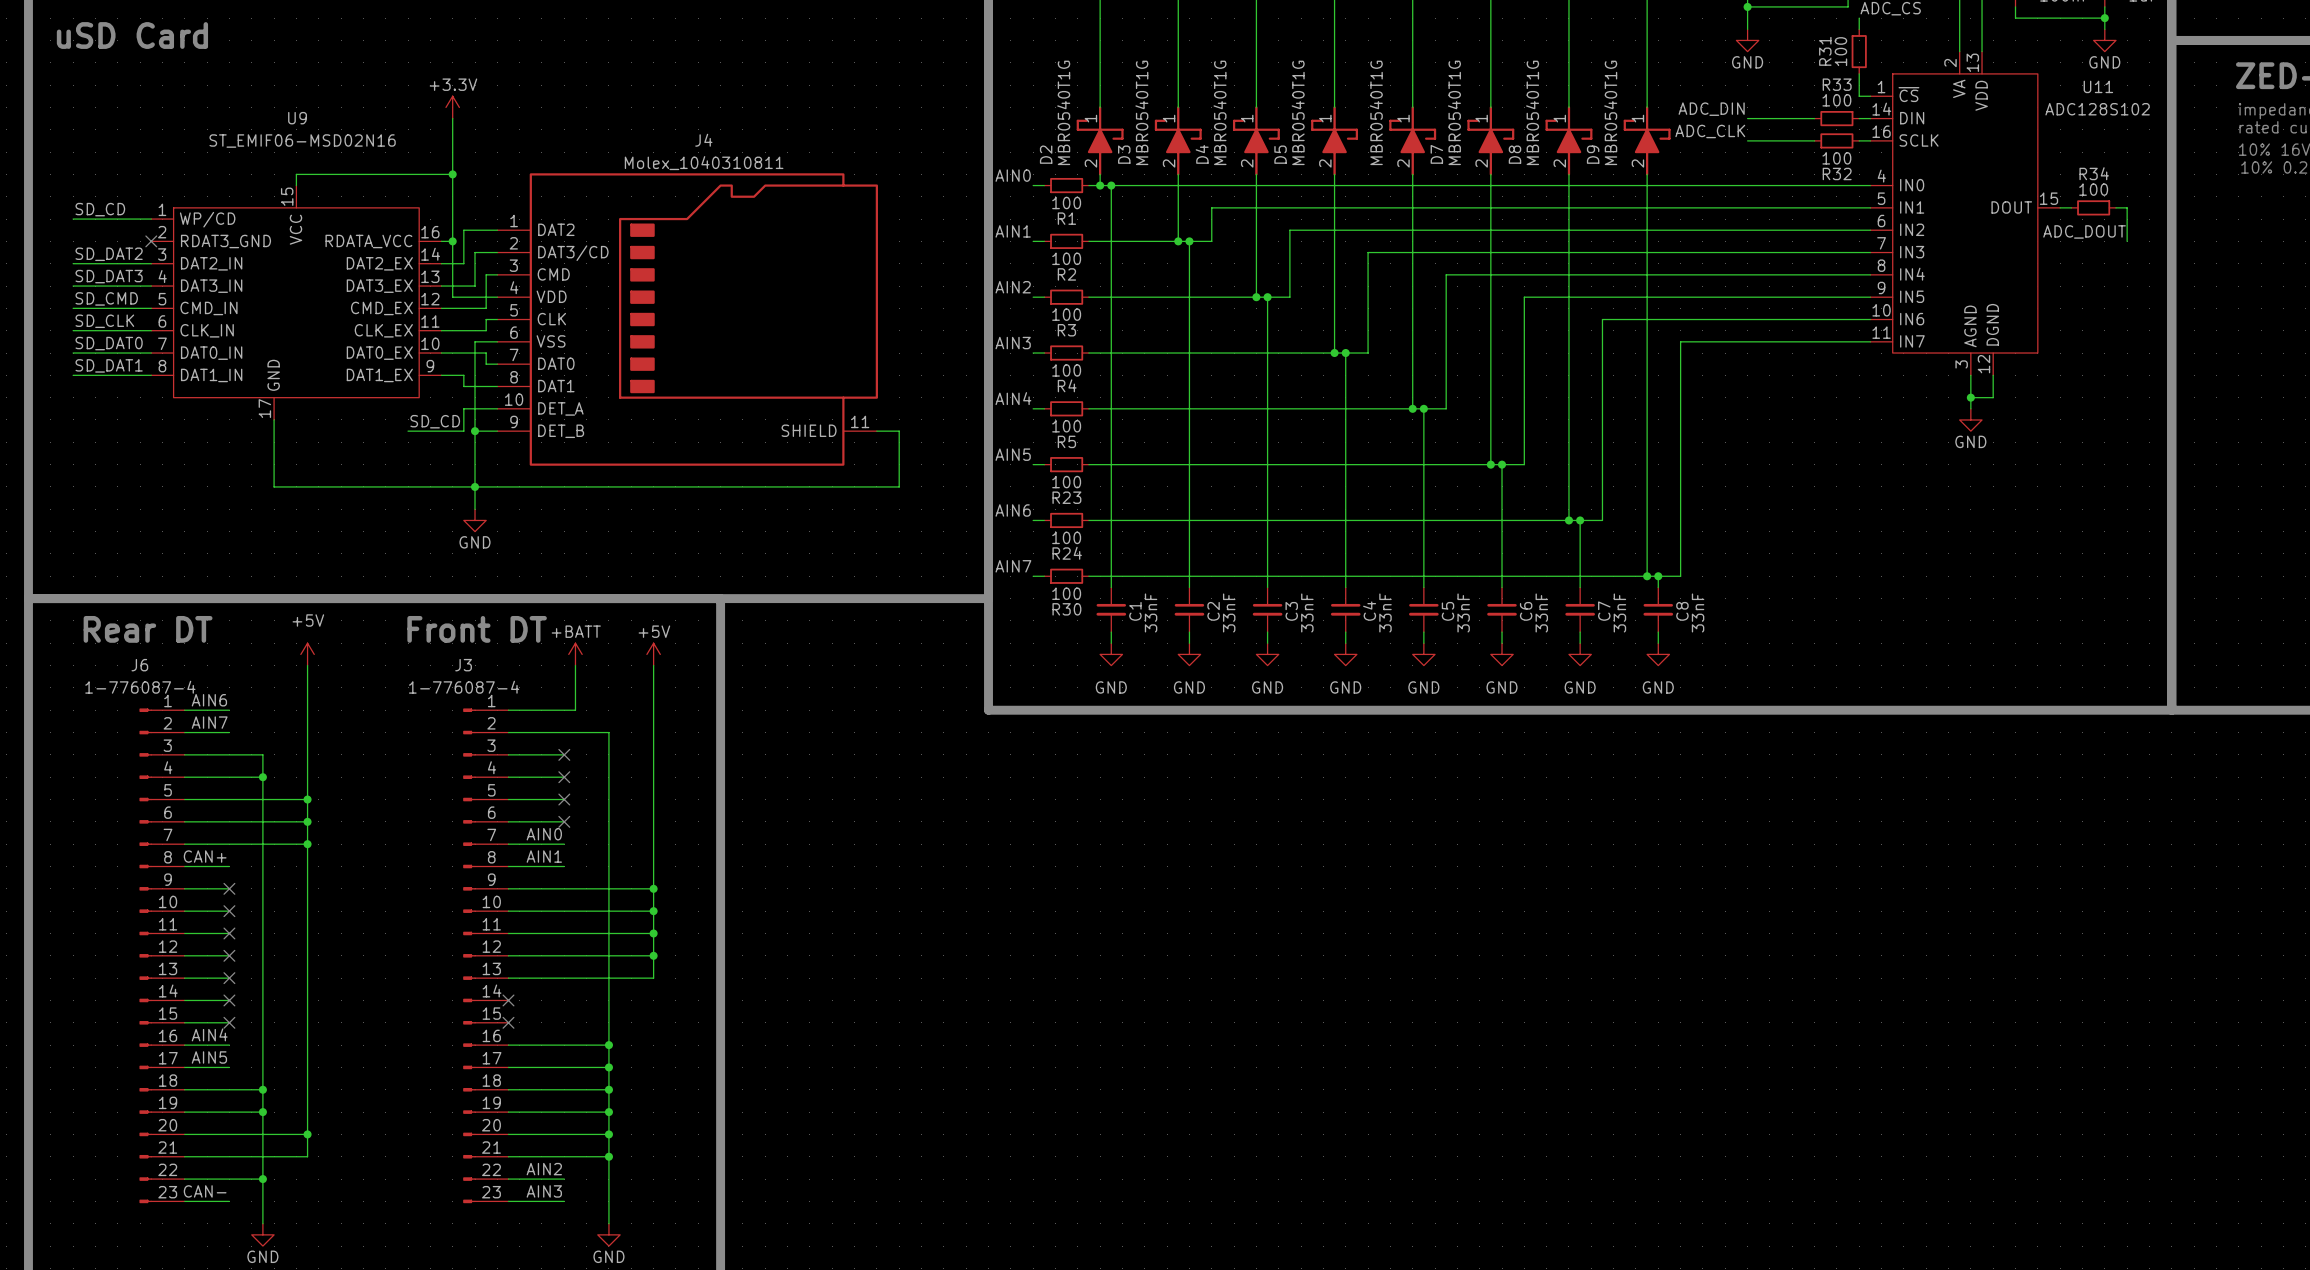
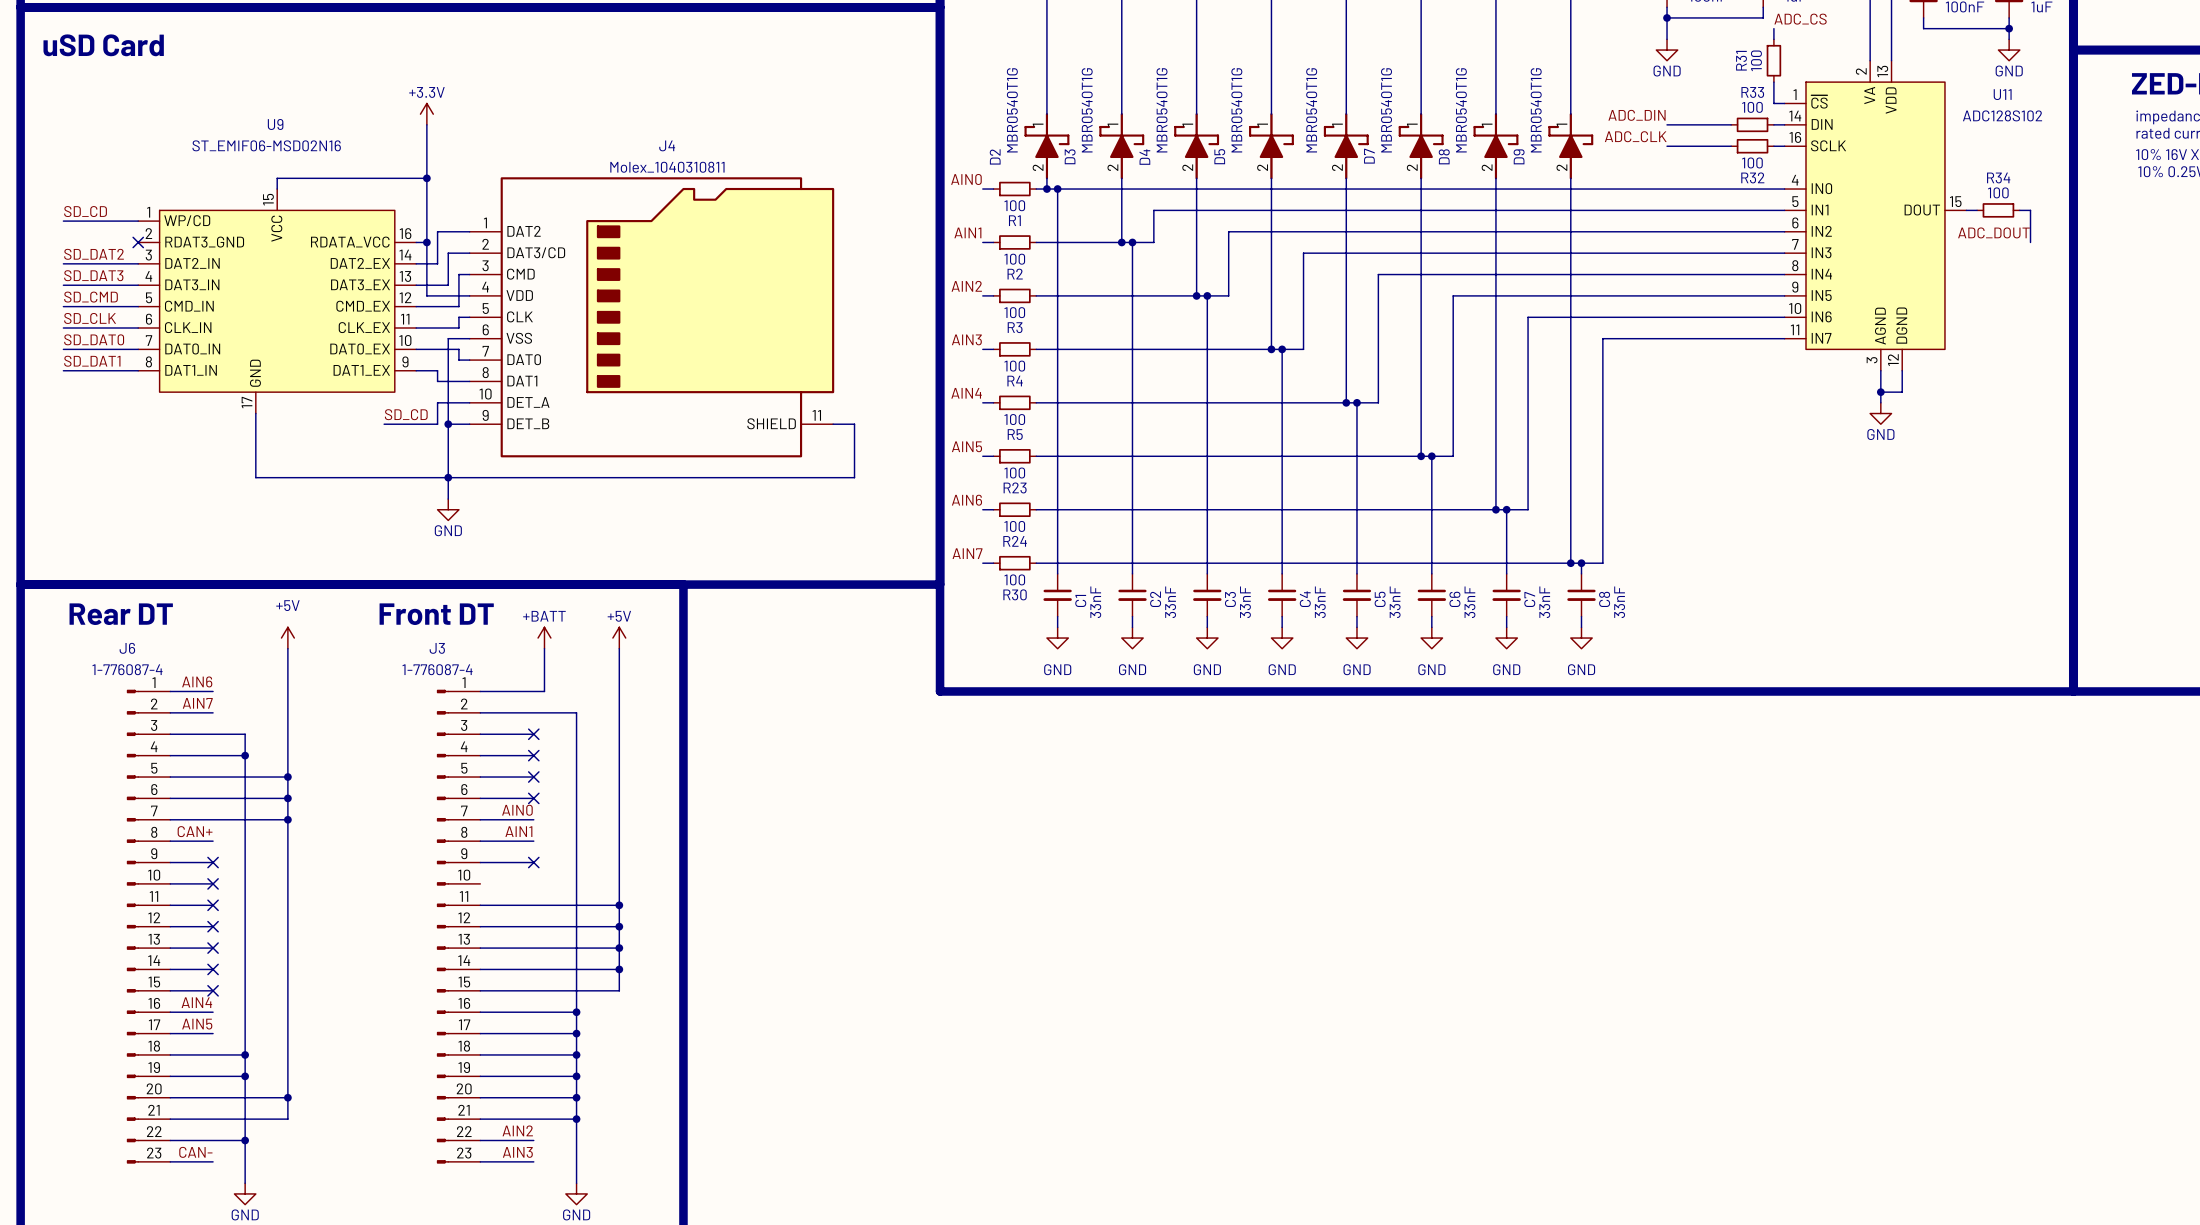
wire: (564, 888) (653, 888) -> none
no-connect mark: none -> (533, 862)
junction: (653, 888) -> none
wire: (508, 911) (653, 911) -> (480, 969) (619, 969)
junction: (653, 911) -> none
wire: none -> (619, 948) (619, 990) (480, 990)
junction: none -> (619, 948)
no-connect mark: (508, 1000) -> none
junction: none -> (619, 969)
no-connect mark: (508, 1022) -> none

